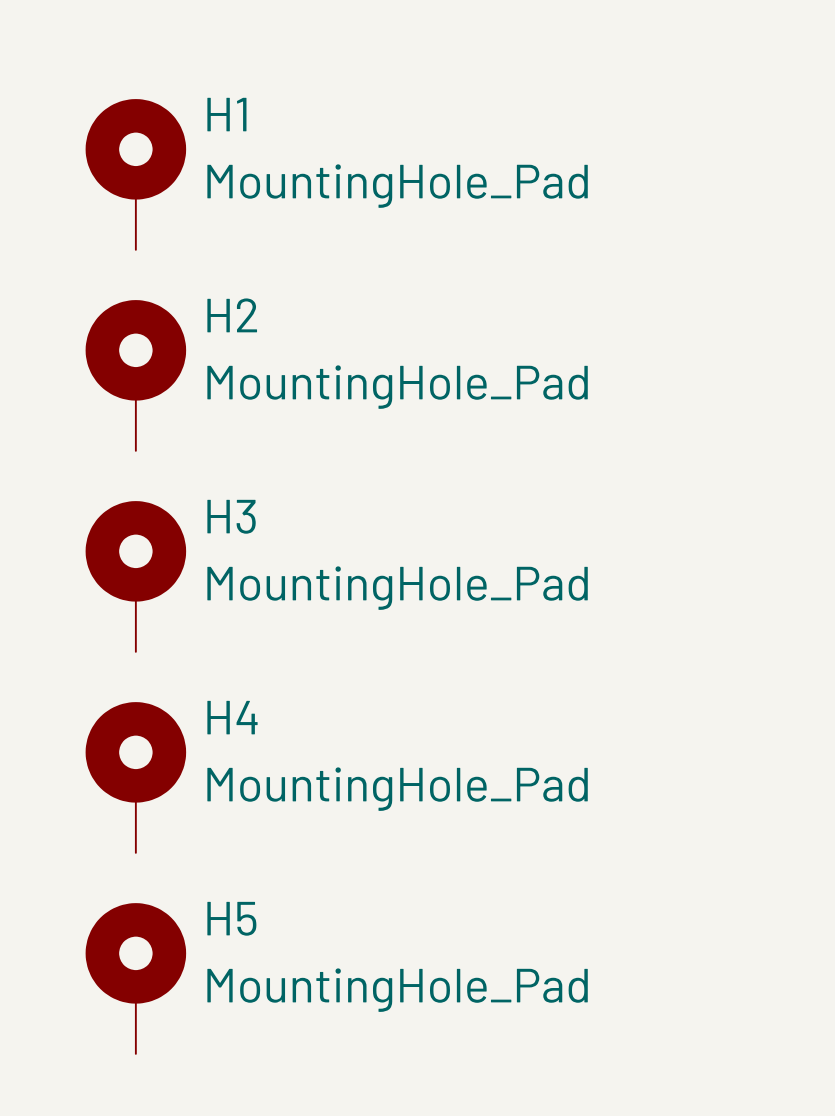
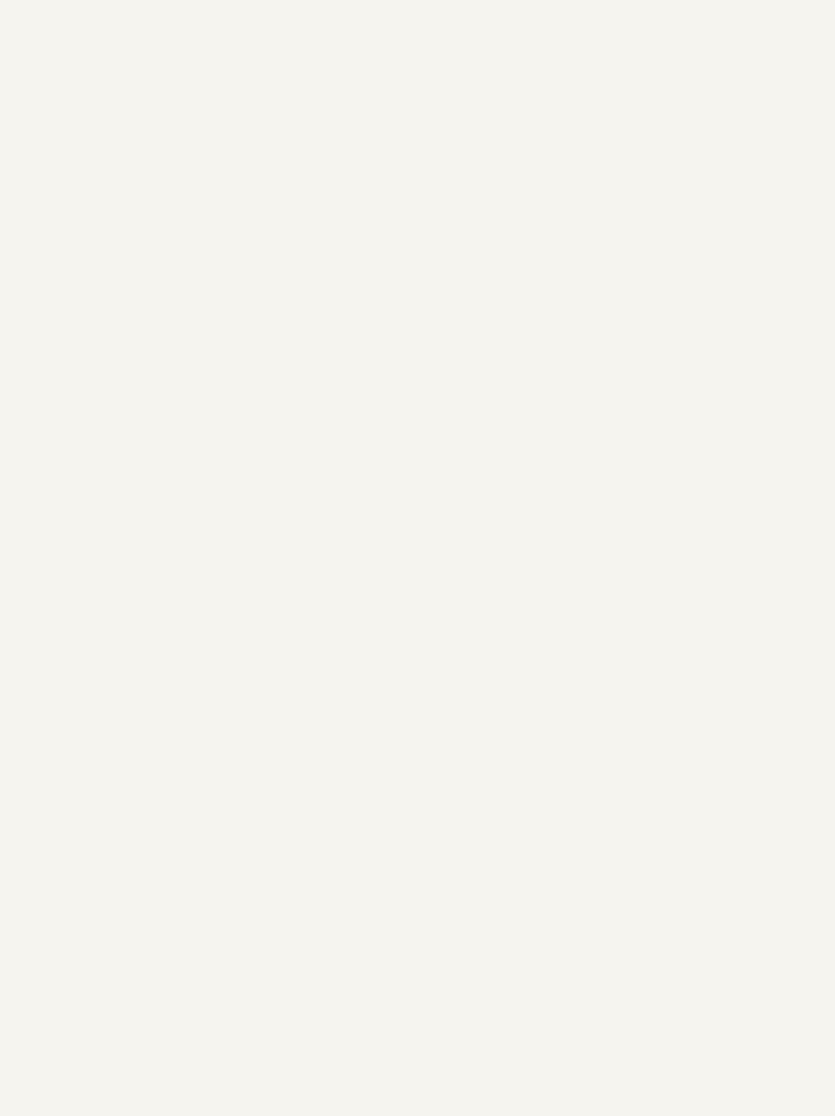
H1: MountingHole_Pad (135, 174) -> none
H2: MountingHole_Pad (135, 375) -> none
H3: MountingHole_Pad (135, 576) -> none
H4: MountingHole_Pad (135, 777) -> none
H5: MountingHole_Pad (135, 978) -> none

